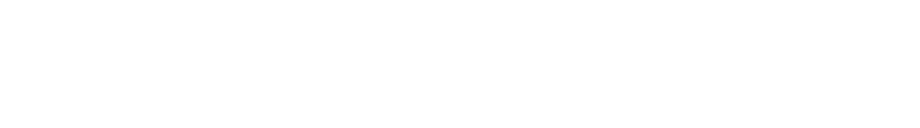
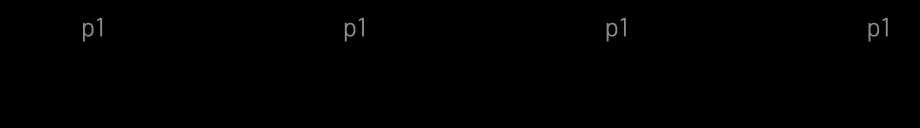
text: none -> p1 (92, 29)
text: none -> p1 (354, 29)
text: none -> p1 (616, 29)
text: none -> p1 (878, 29)

